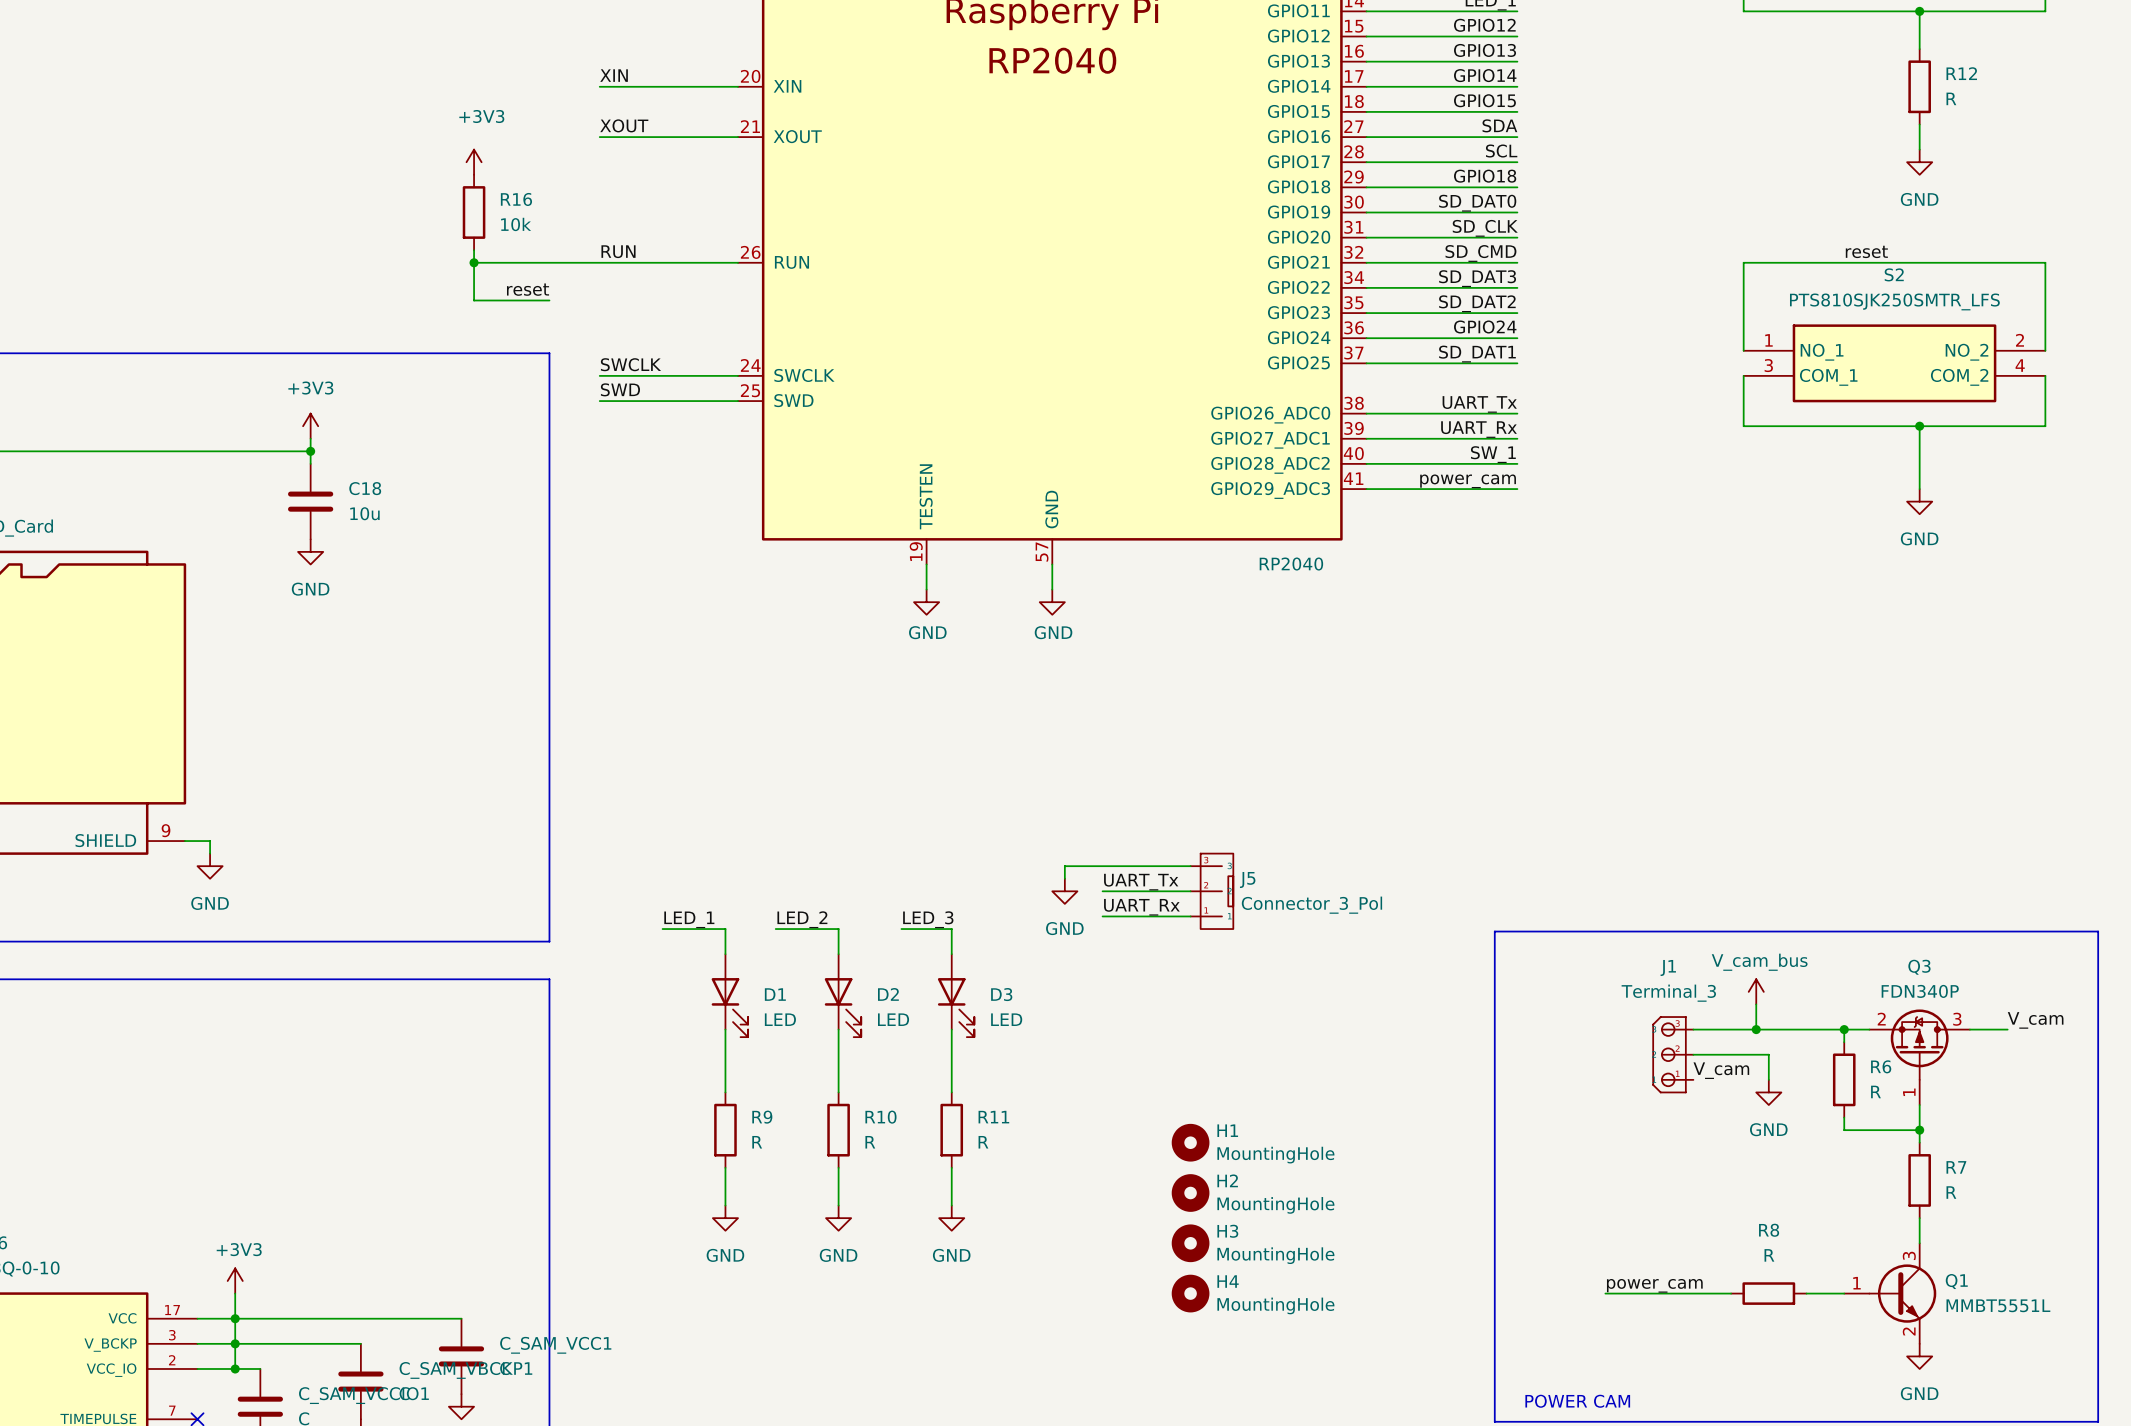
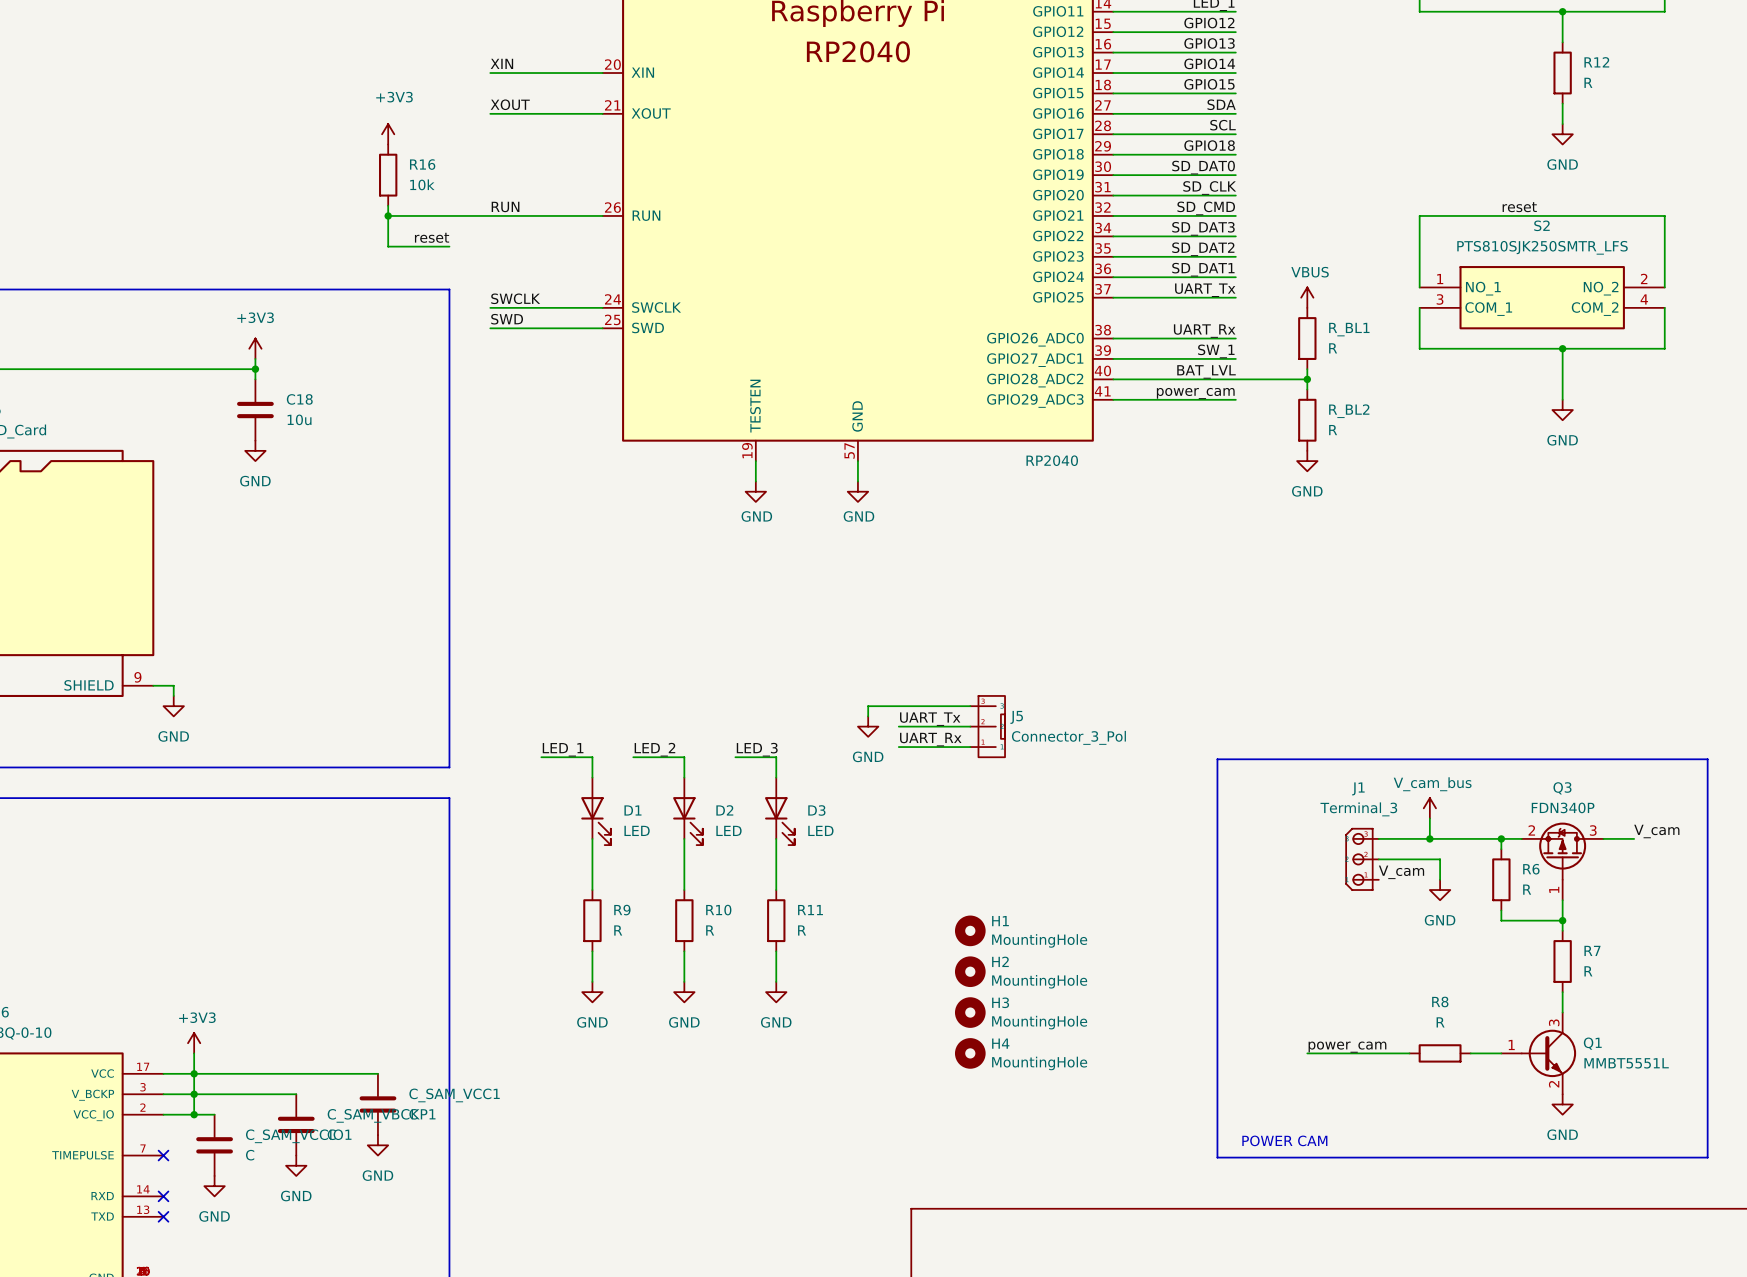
label: GPIO24 (1485, 327) -> SD_DAT1 (1203, 269)
label: SD_DAT1 (1477, 354) -> UART_Tx (1205, 290)
power symbol: none -> VBUS (1307, 297)
label: UART_Tx (1479, 404) -> UART_Rx (1204, 331)
R_BL1: none -> R (1307, 338)
label: UART_Rx (1479, 429) -> SW_1 (1216, 351)
wire: none -> (1307, 369) (1307, 389)
label: SW_1 (1493, 454) -> BAT_LVL (1206, 371)
wire: none -> (1235, 379) (1307, 379)
junction: none -> (1307, 379)
R_BL2: none -> R (1307, 420)
power symbol: none -> GND (1307, 461)

